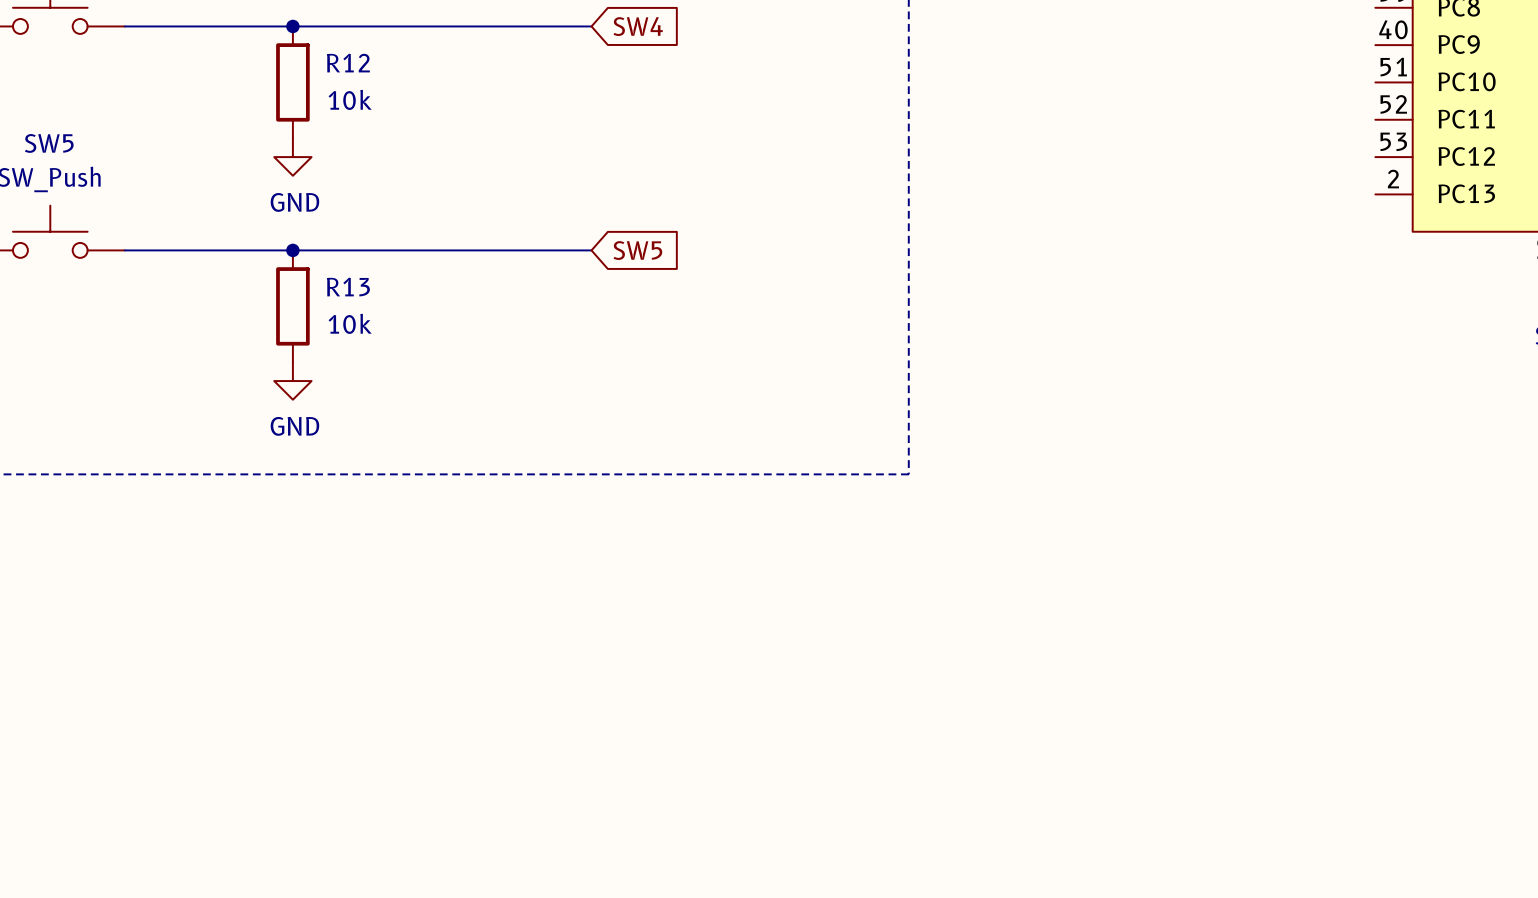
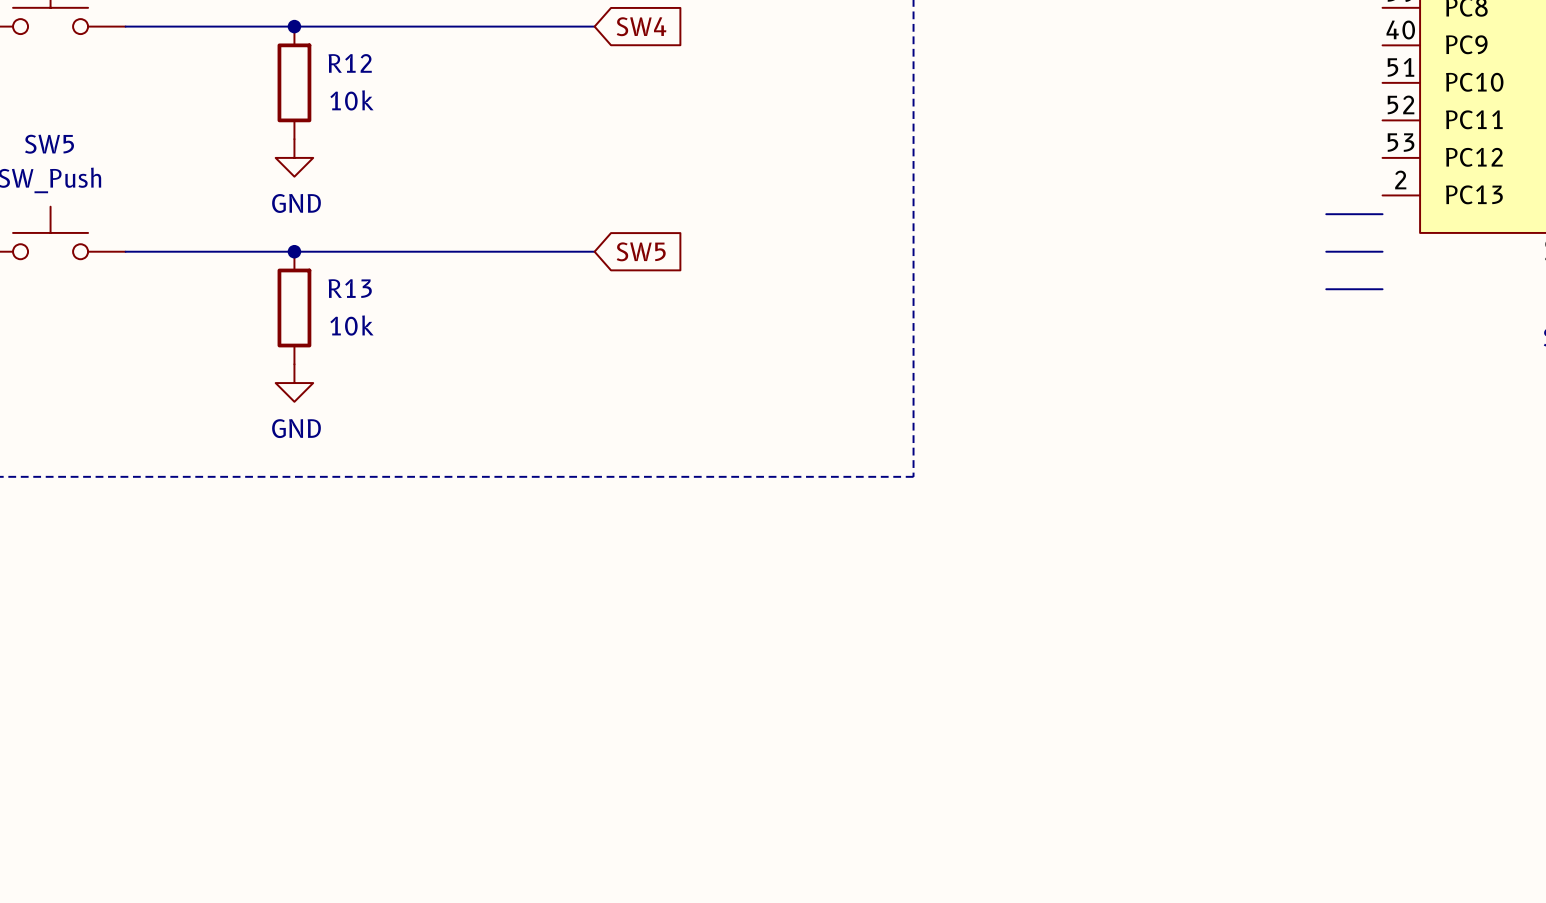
wire: none -> (1326, 214) (1382, 214)
wire: none -> (1326, 251) (1382, 251)
wire: none -> (1326, 289) (1382, 289)

